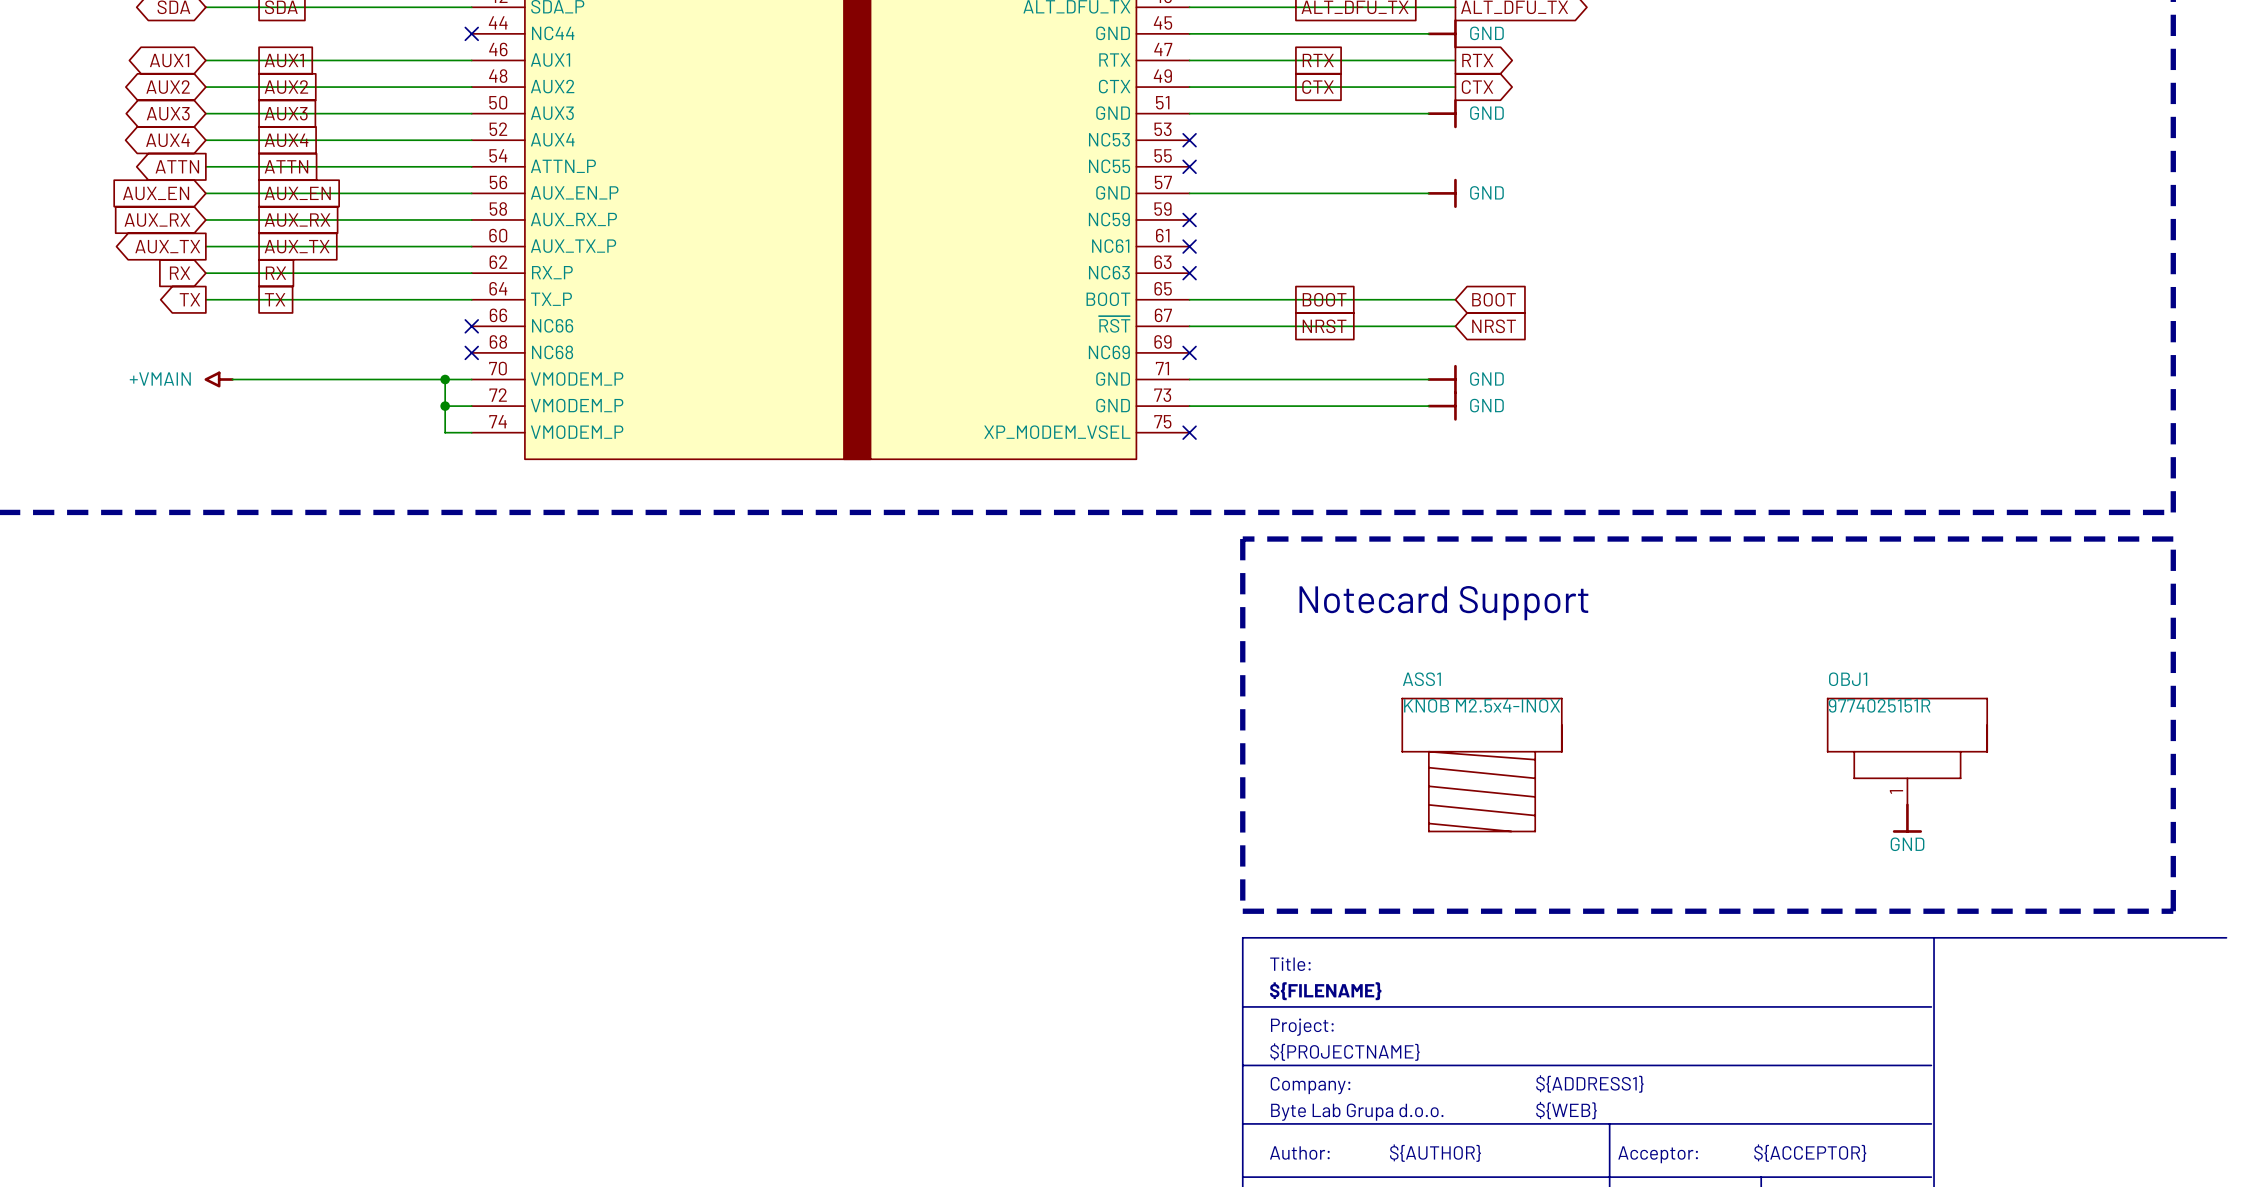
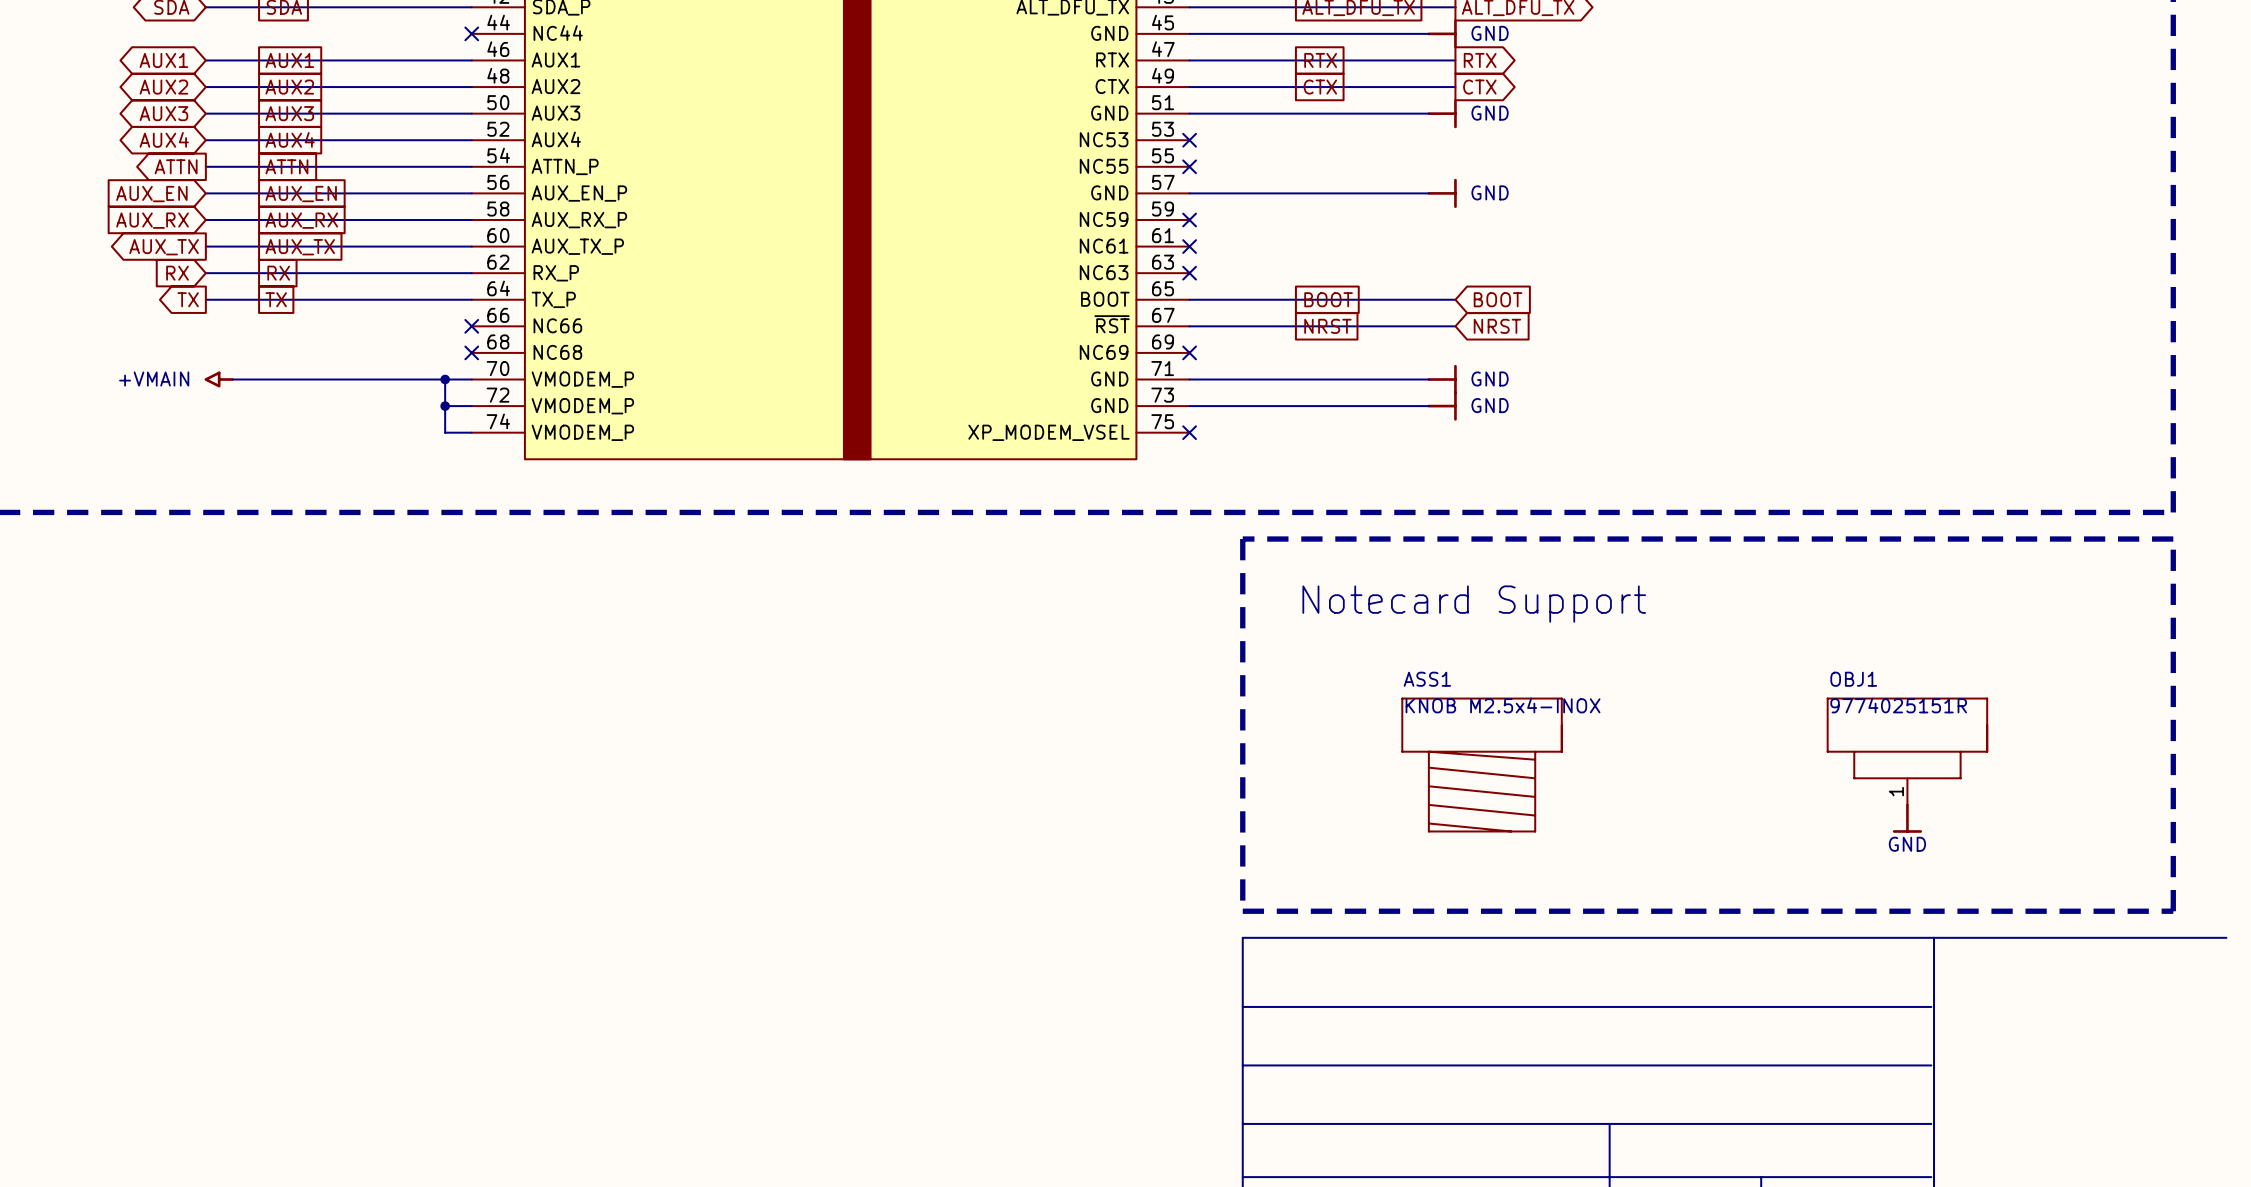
text: Title: (1290, 964) -> none
text: ${FILENAME} (1325, 991) -> none
text: Project: (1302, 1027) -> none
text: ${PROJECTNAME} (1345, 1052) -> none
text: ${ADDRESS1} (1589, 1084) -> none
text: Company: (1310, 1085) -> none
text: ${WEB} (1566, 1110) -> none
text: Byte Lab Grupa d.o.o. (1357, 1112) -> none
text: Author: (1299, 1153) -> none
text: ${AUTHOR} (1435, 1153) -> none
text: ${ACCEPTOR} (1810, 1153) -> none
text: Acceptor: (1658, 1154) -> none

